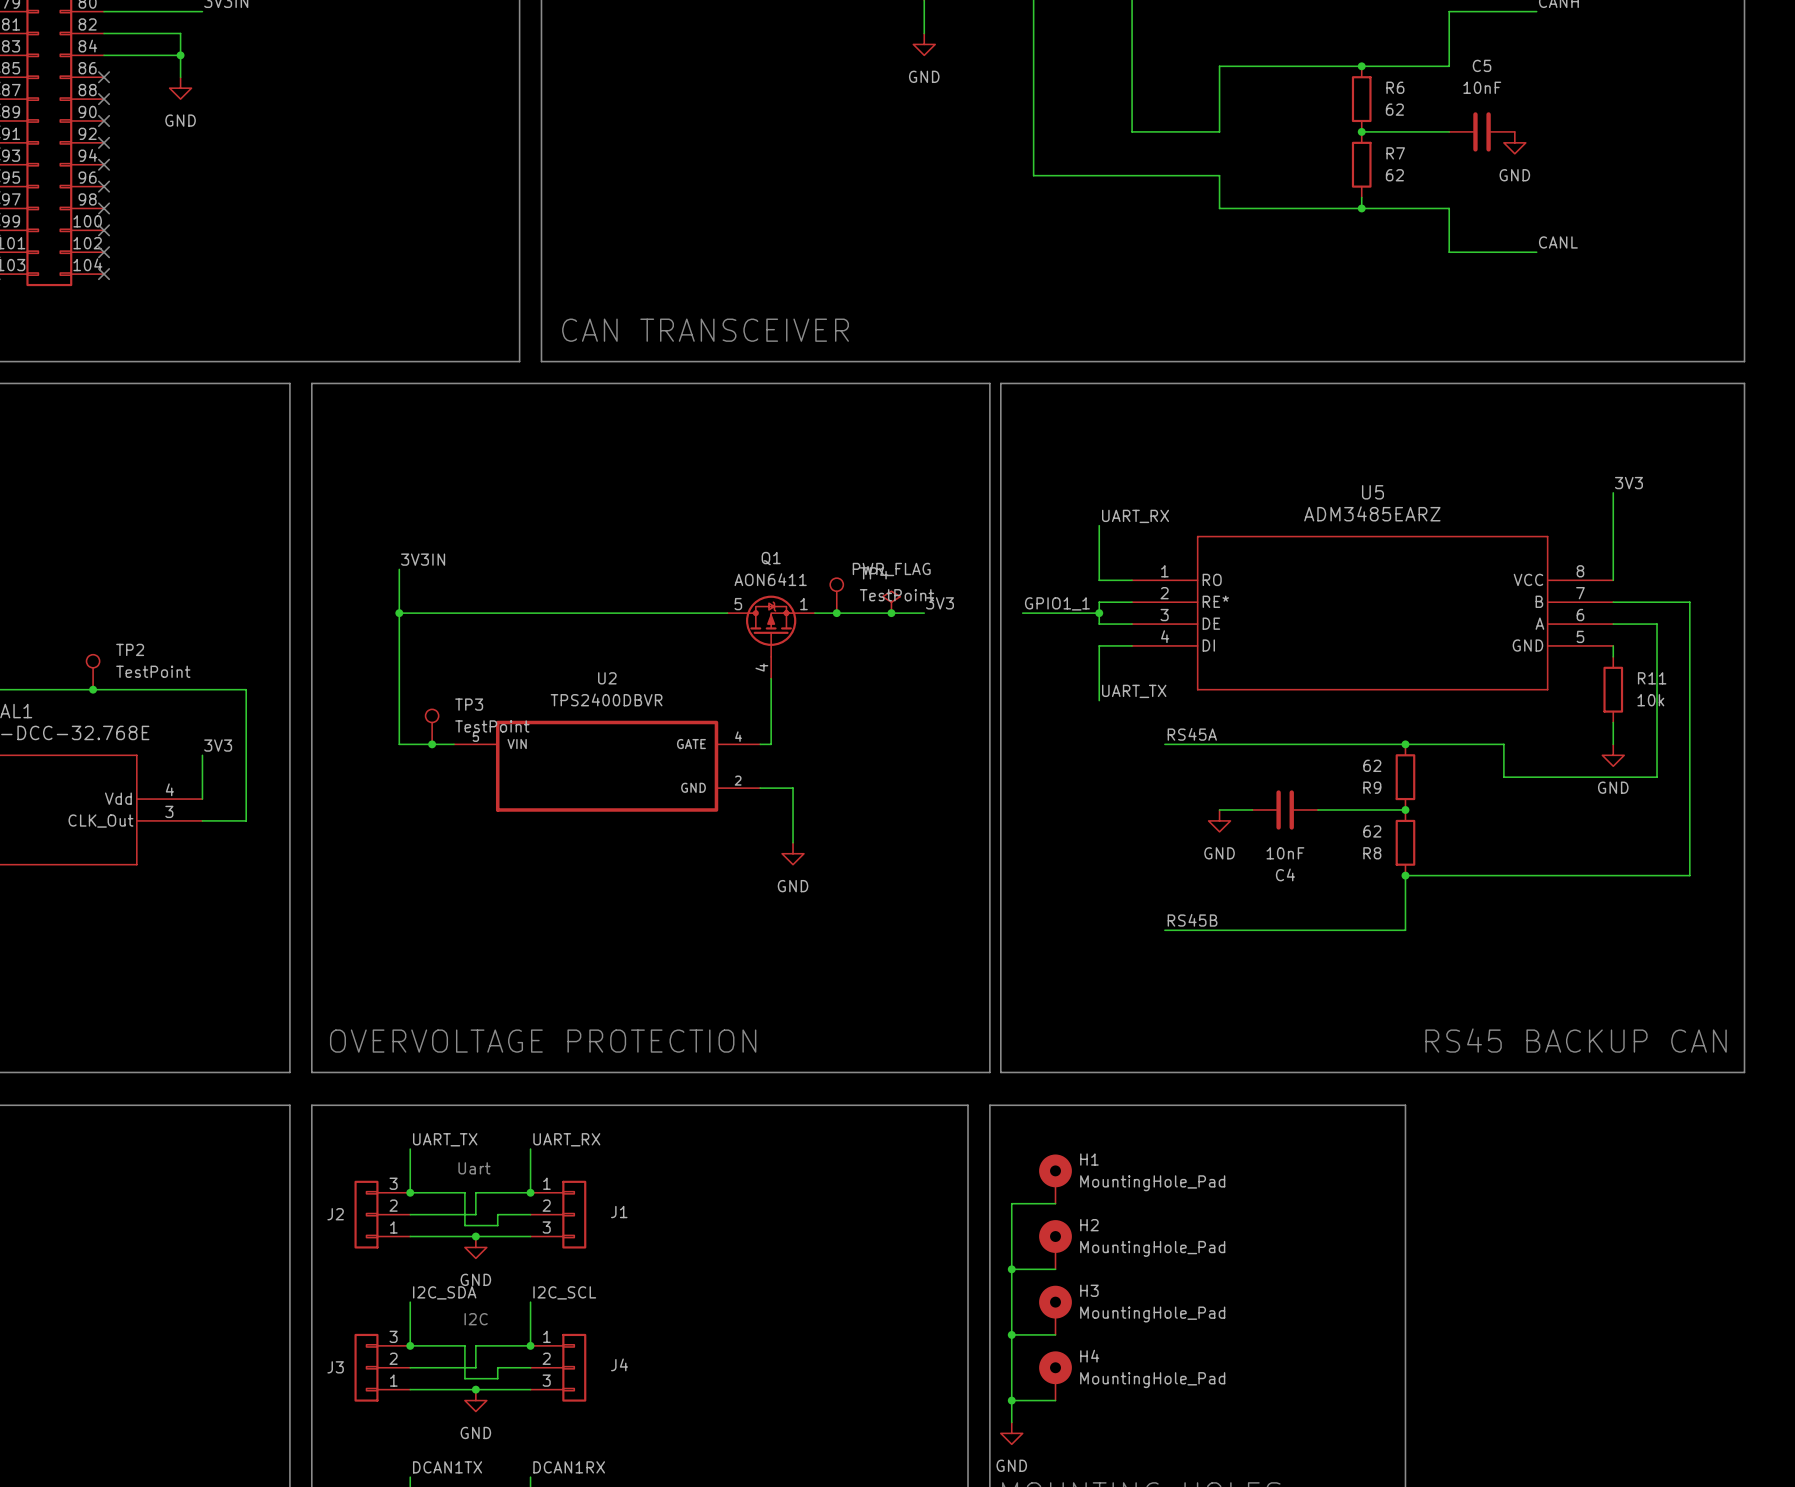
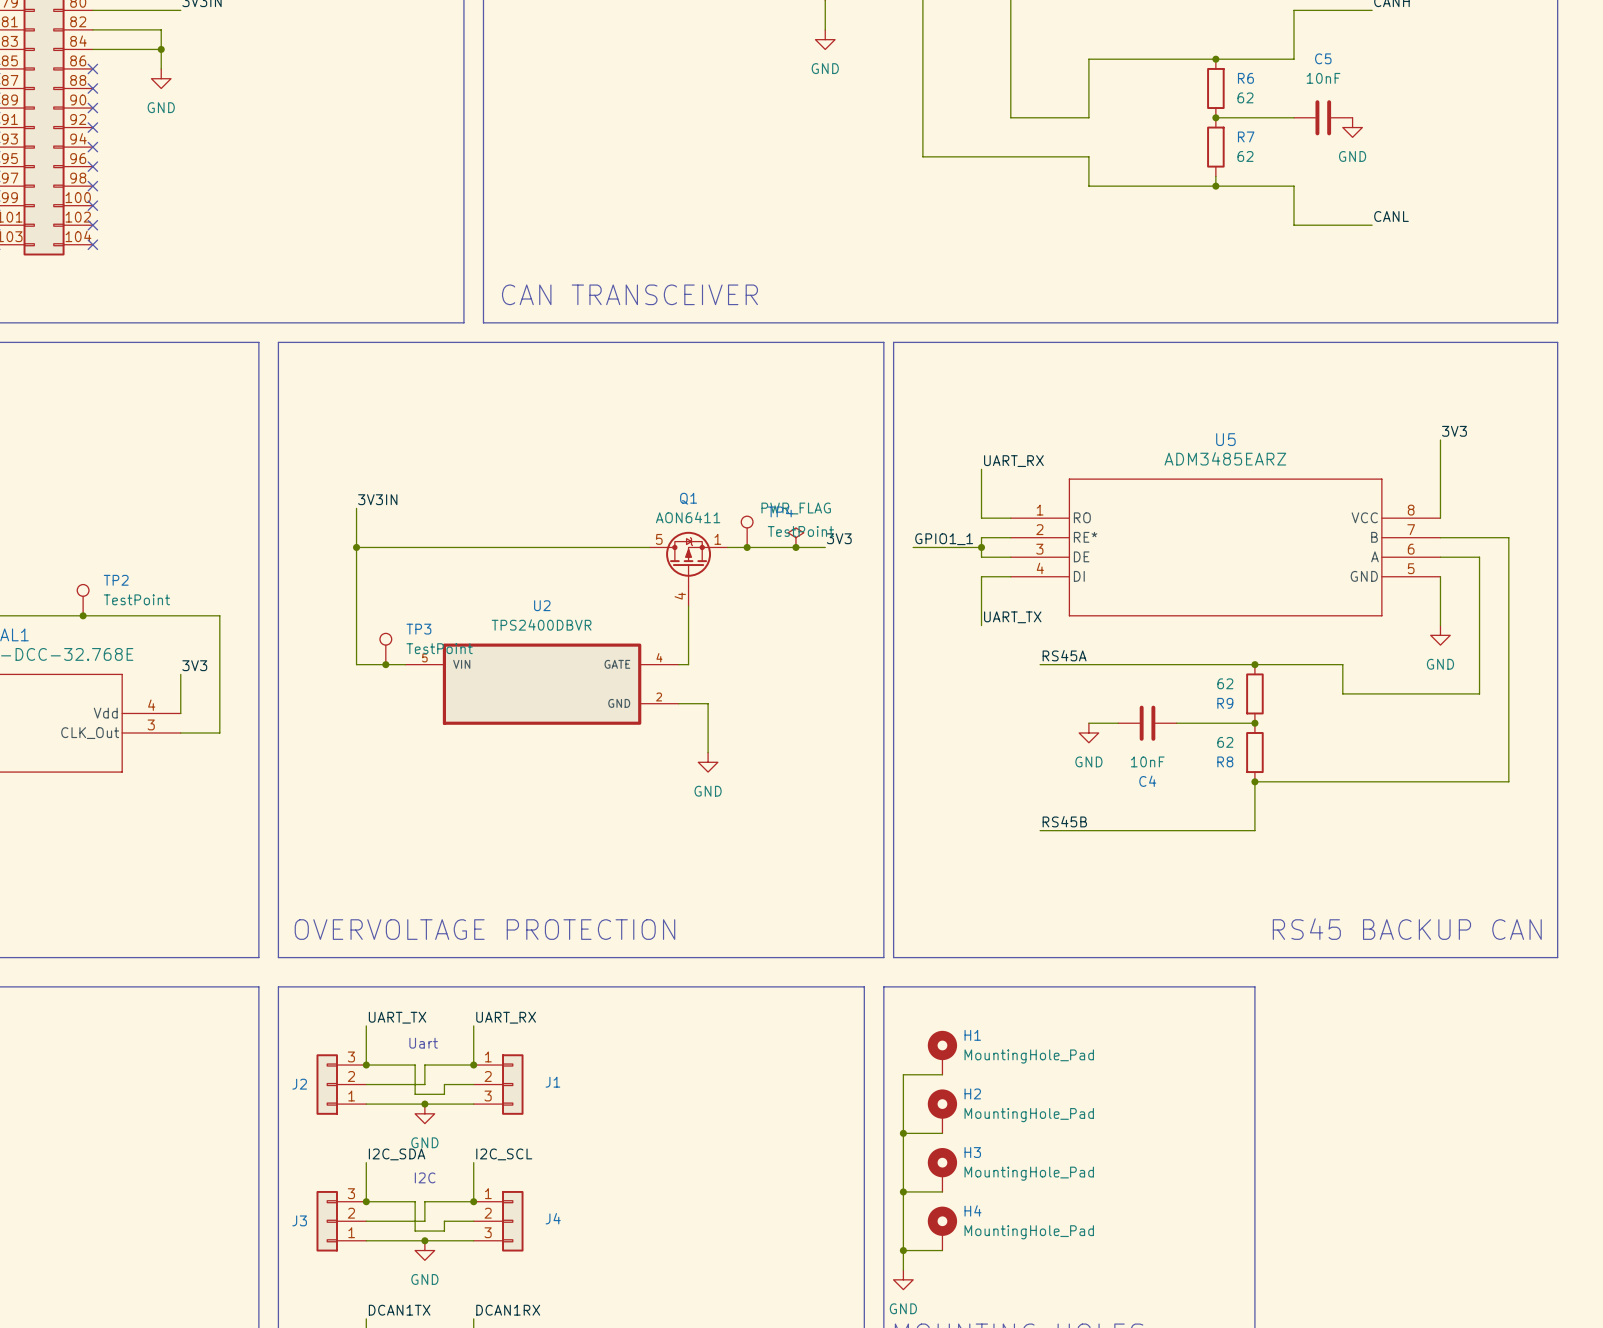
wire: none -> (1440, 586) (1440, 625)
R11: 10k (1613, 689) -> none
wire: (1613, 722) (1613, 744) -> none
power symbol position: GND (1613, 755) -> GND (1440, 635)

